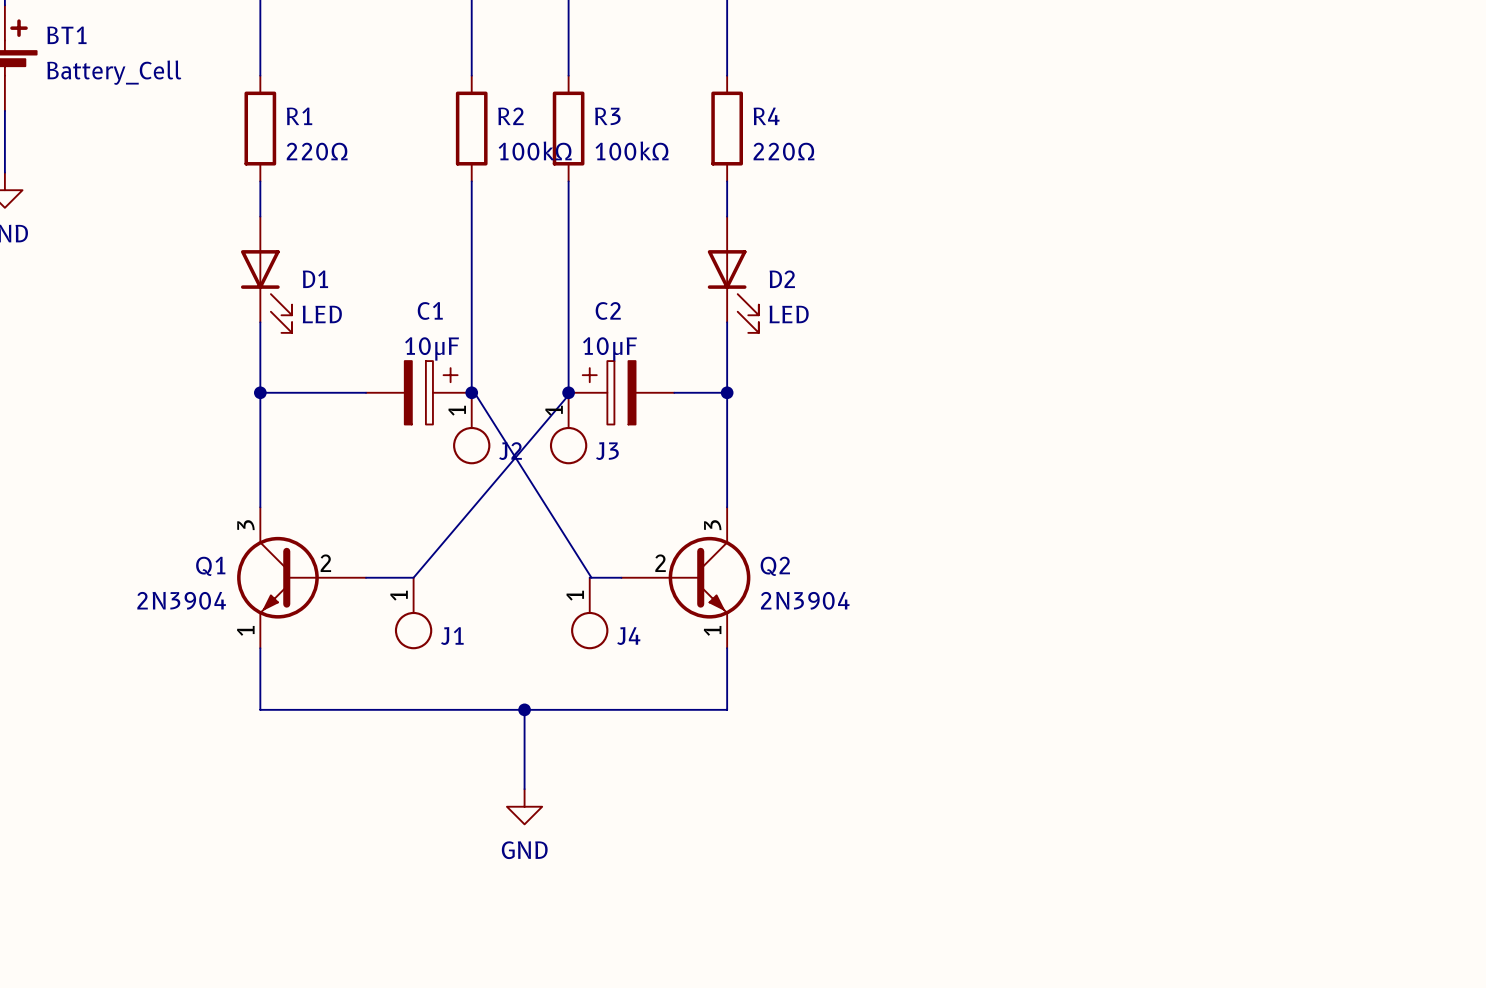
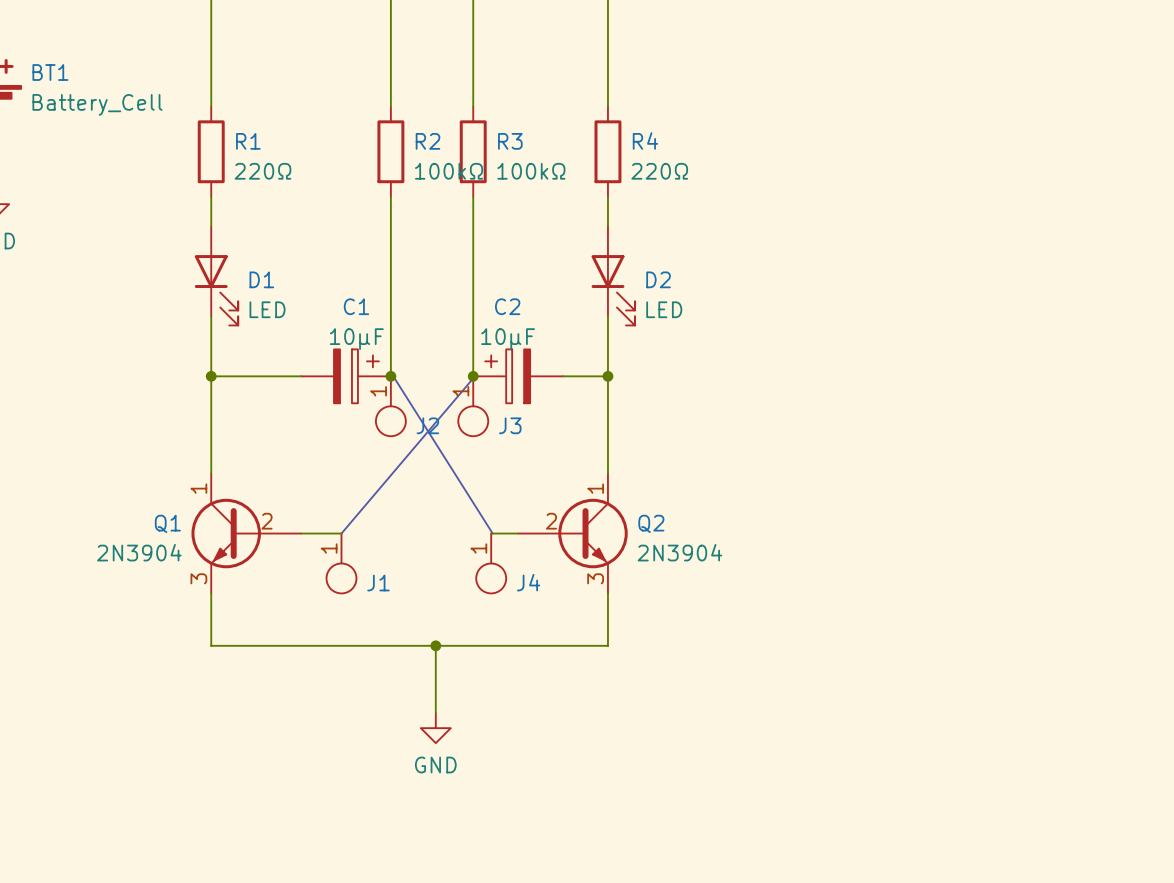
Q1 pin number: 3 (245, 525) -> 1 (198, 488)
Q2 pin number: 3 (712, 525) -> 1 (595, 488)
Q1 pin number: 1 (245, 630) -> 3 (198, 578)
Q2 pin number: 1 (712, 630) -> 3 (595, 578)

